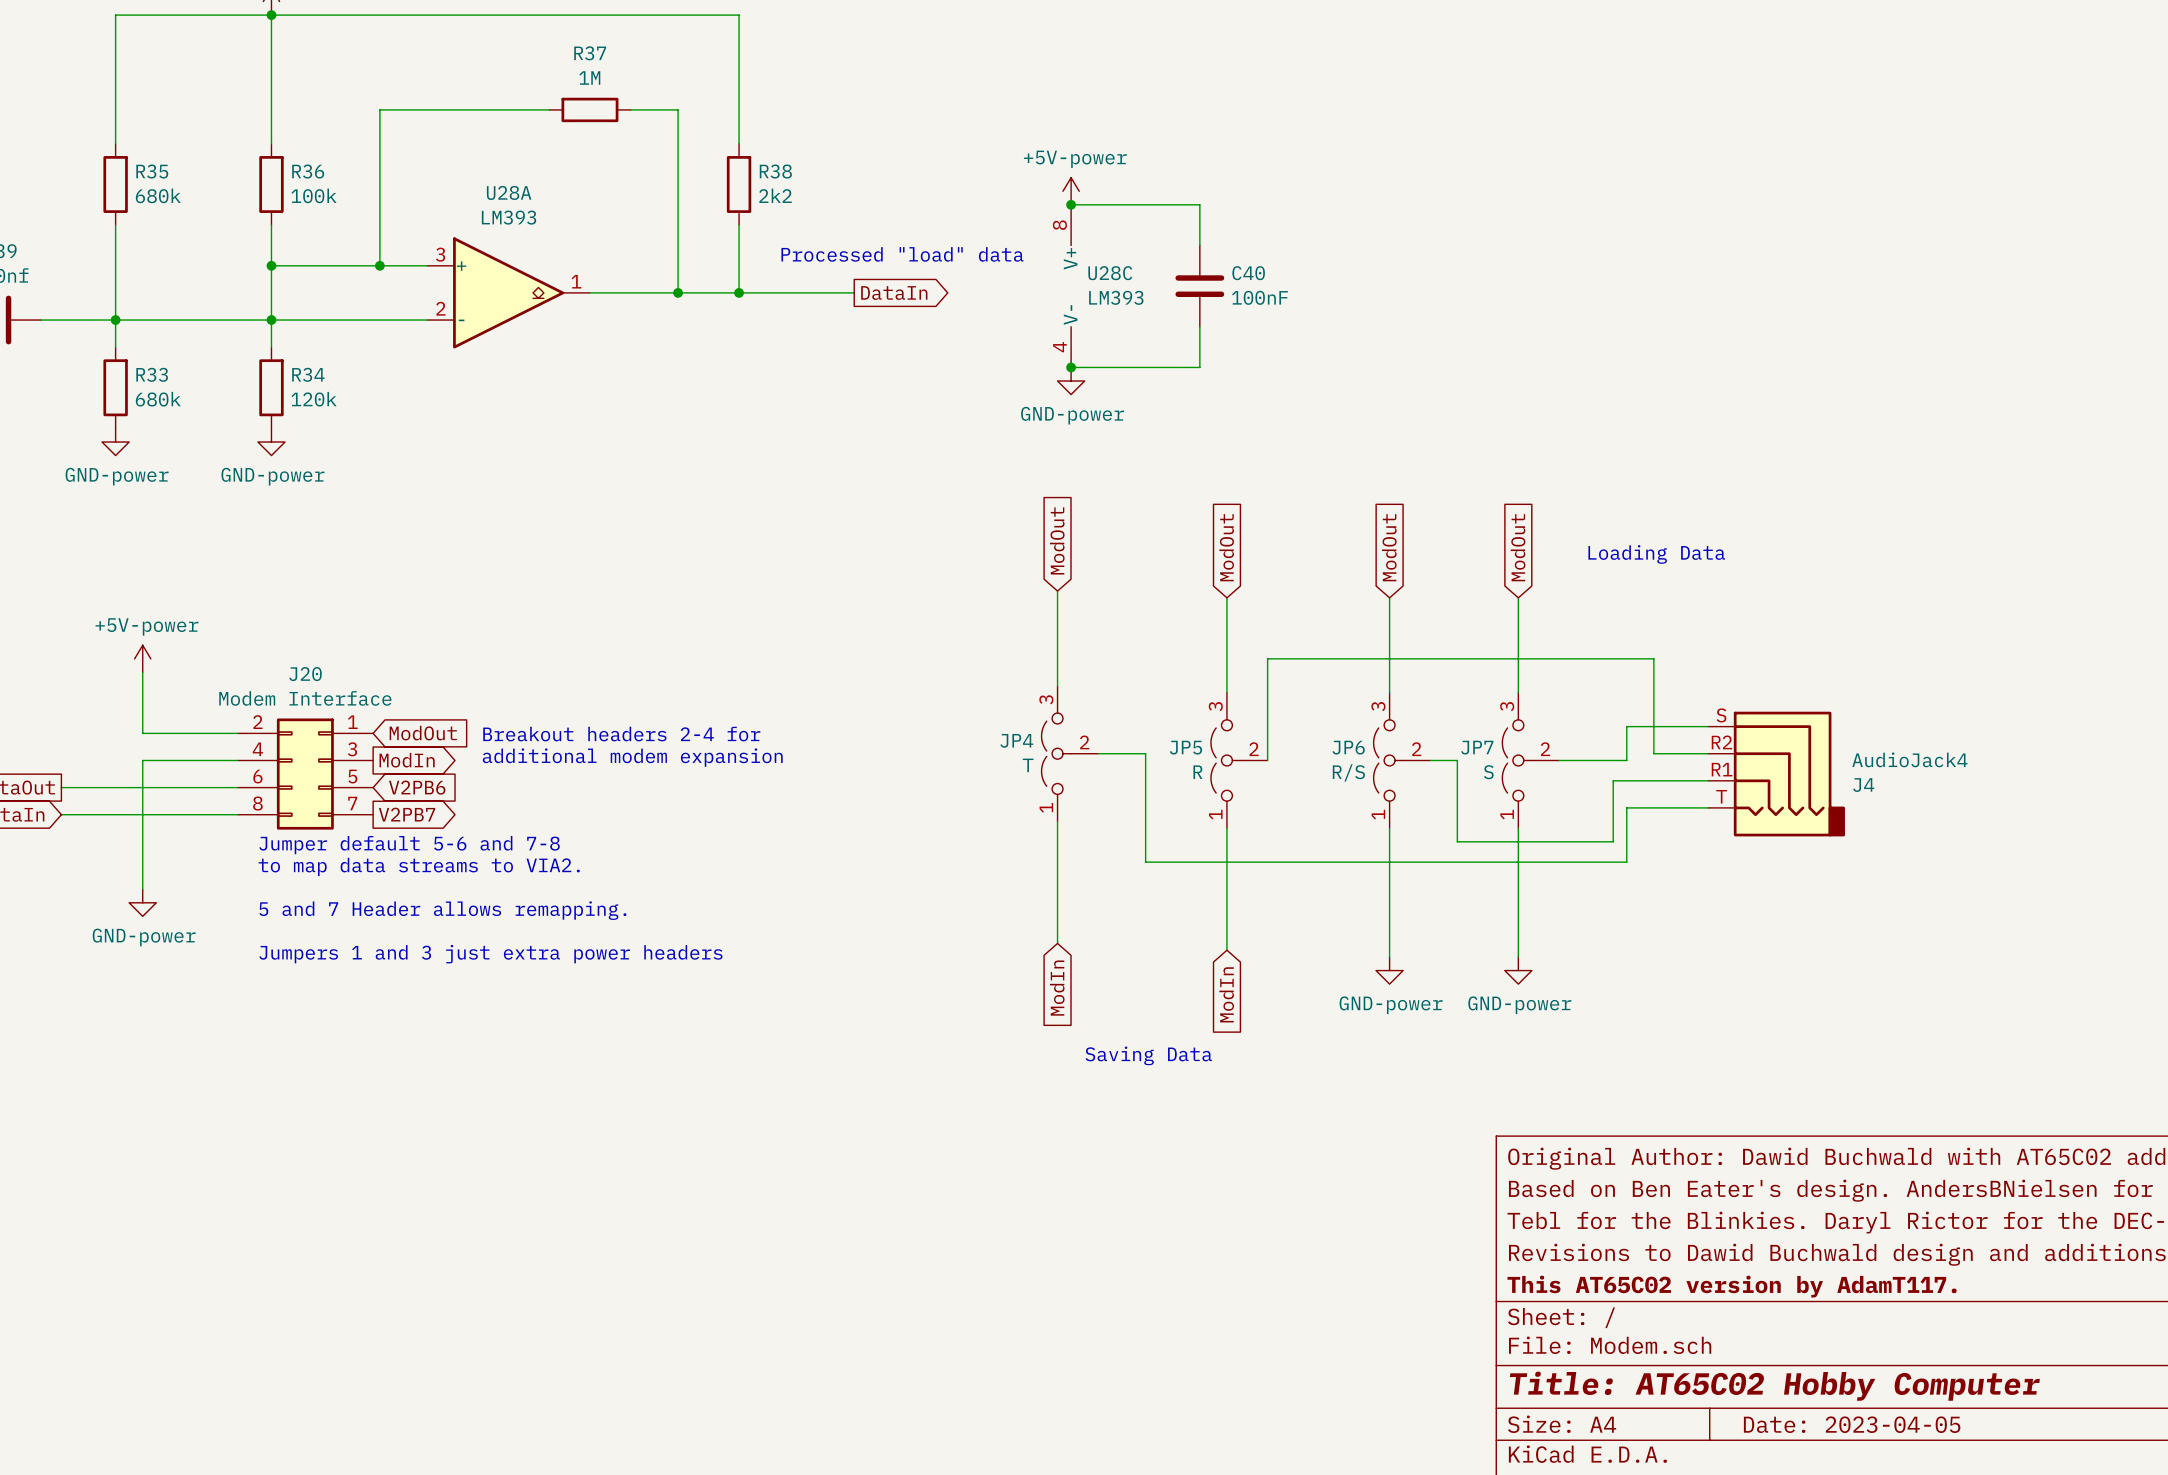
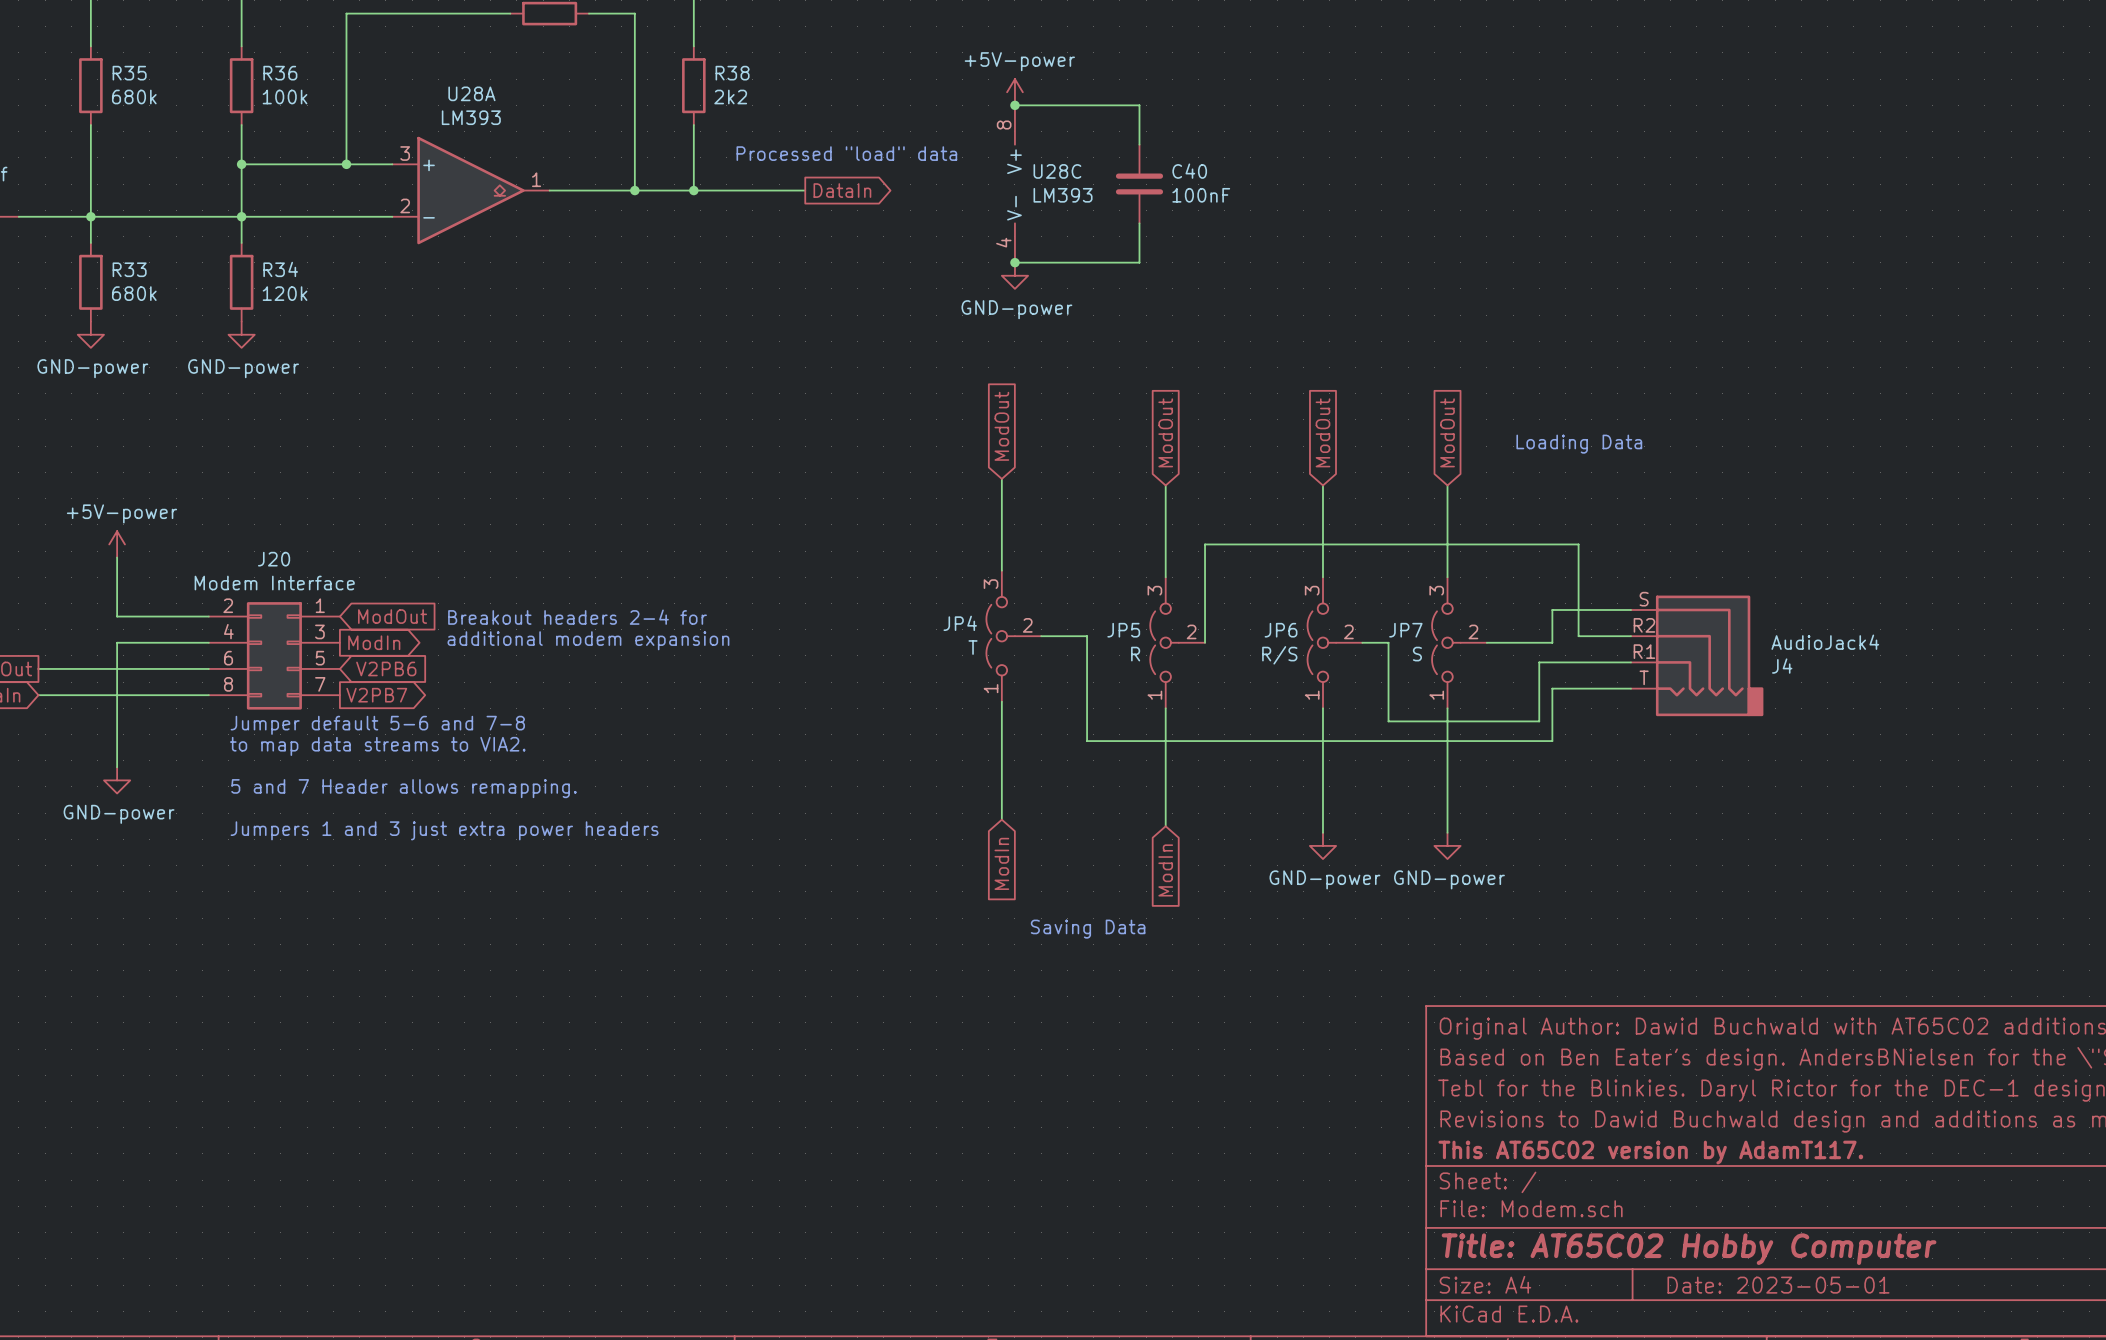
title block: Date: 2023-04-05 (1852, 1424) -> Date: 2023-05-01 (1778, 1285)

